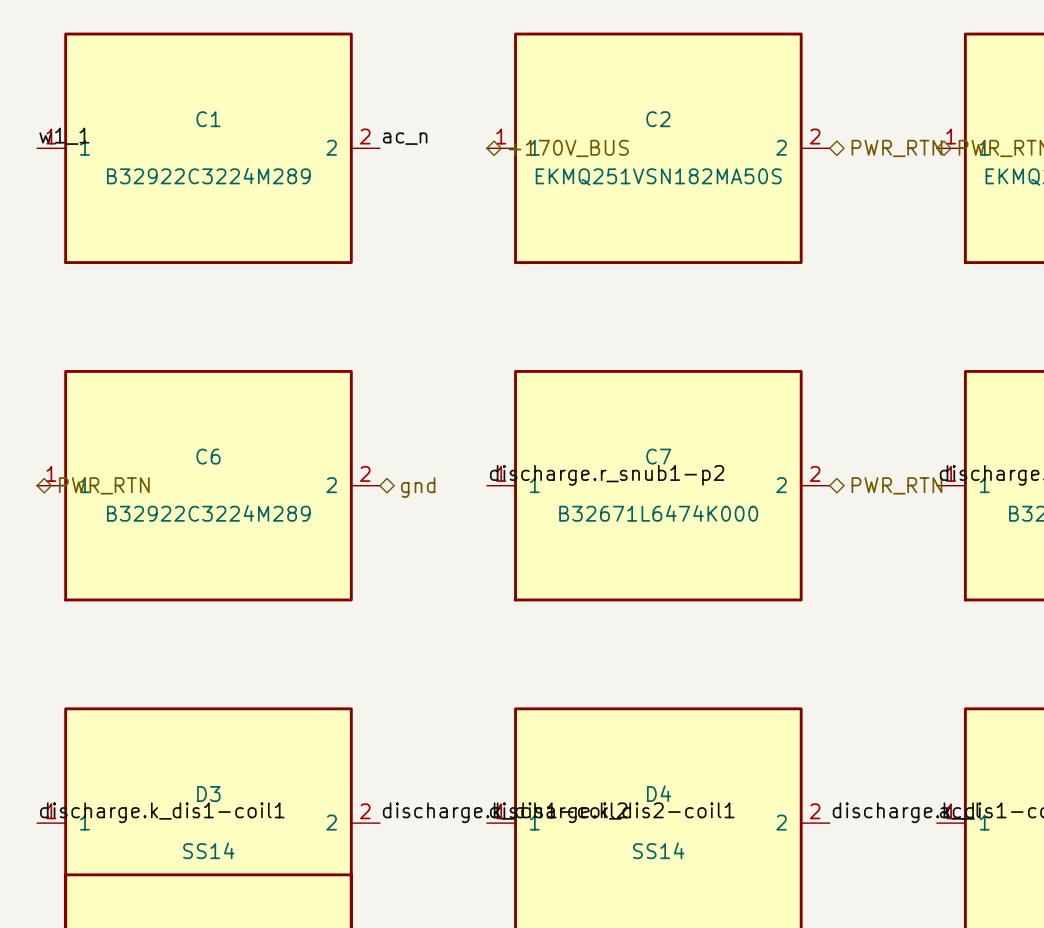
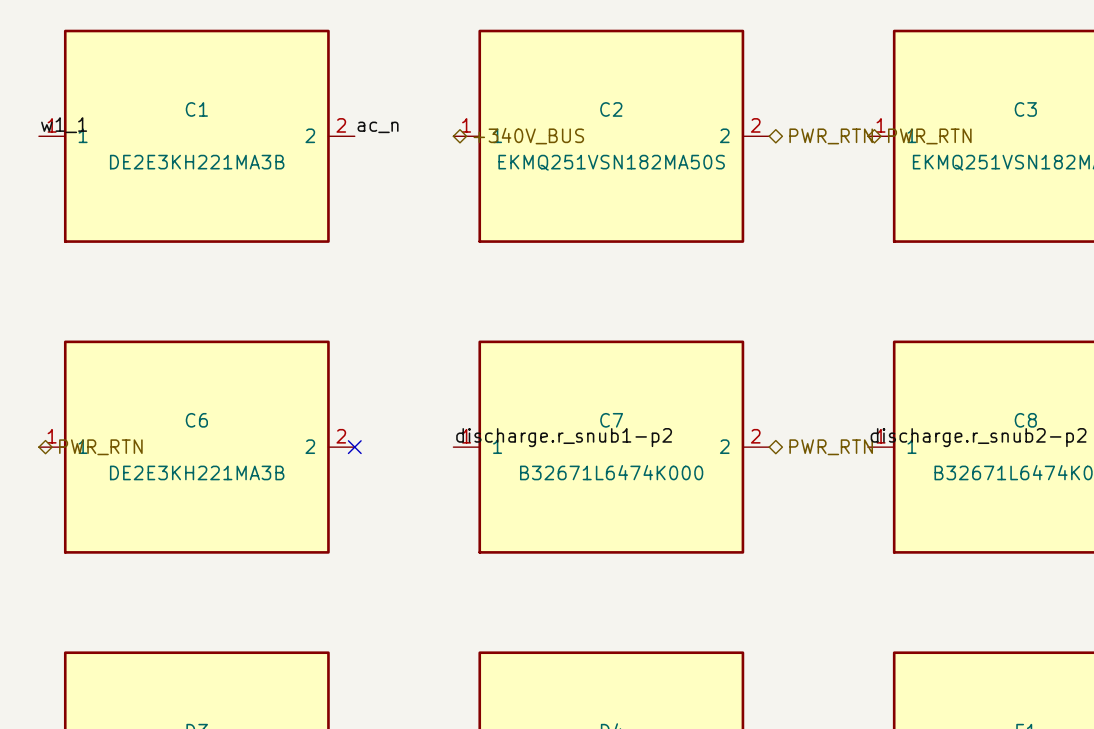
hierarchical label: +170V_BUS (568, 148) -> +340V_BUS (528, 136)
C1 value: B32922C3224M289 (208, 175) -> DE2E3KH221MA3B (197, 162)
no-connect mark: none -> (354, 447)
hierarchical label: gnd (418, 487) -> none
C6 value: B32922C3224M289 (208, 513) -> DE2E3KH221MA3B (197, 472)

